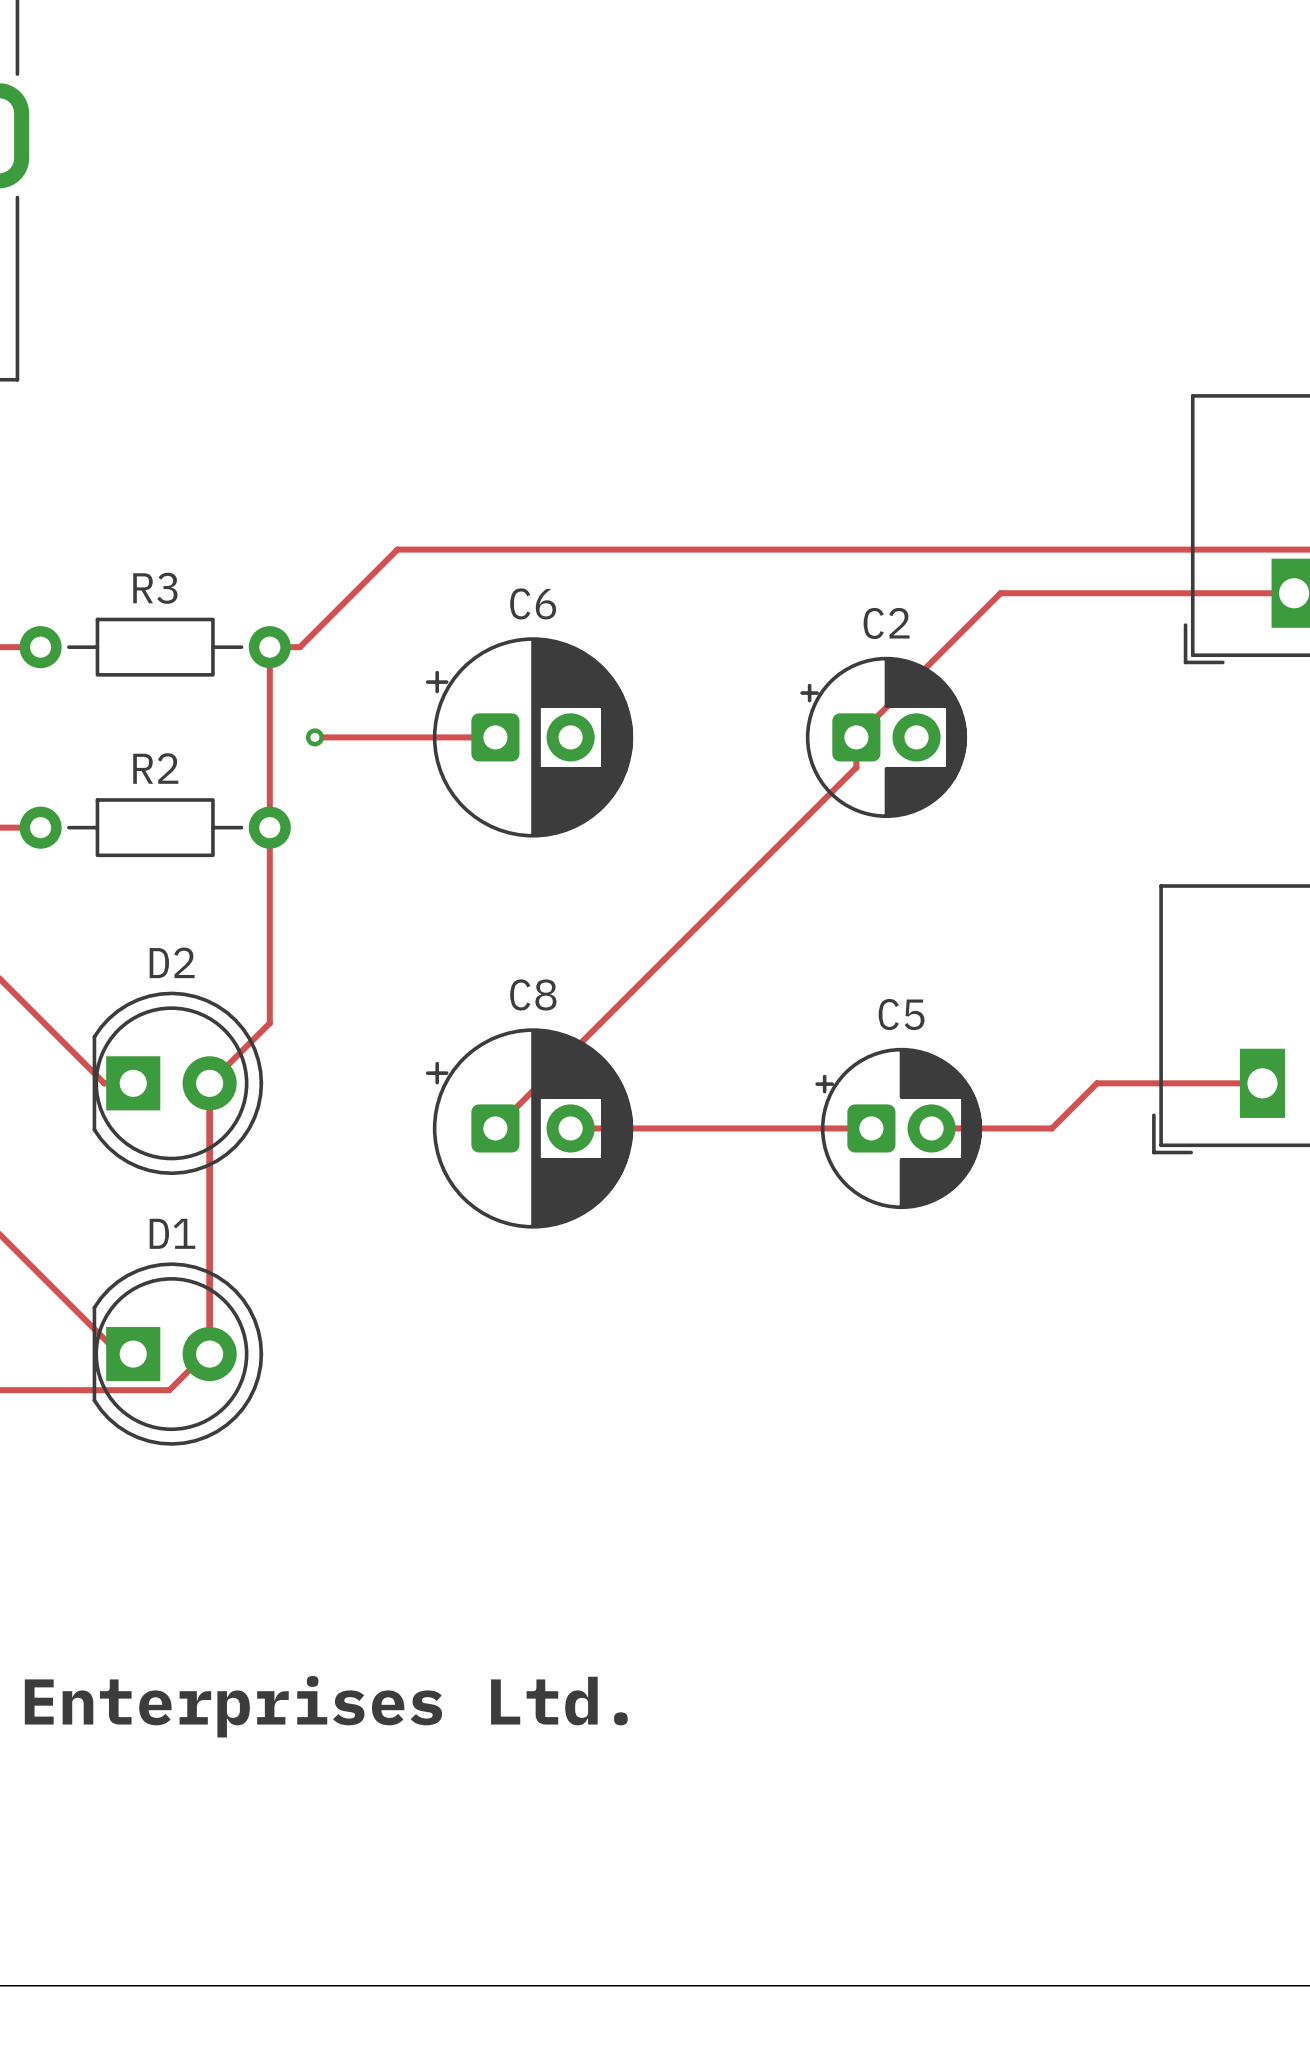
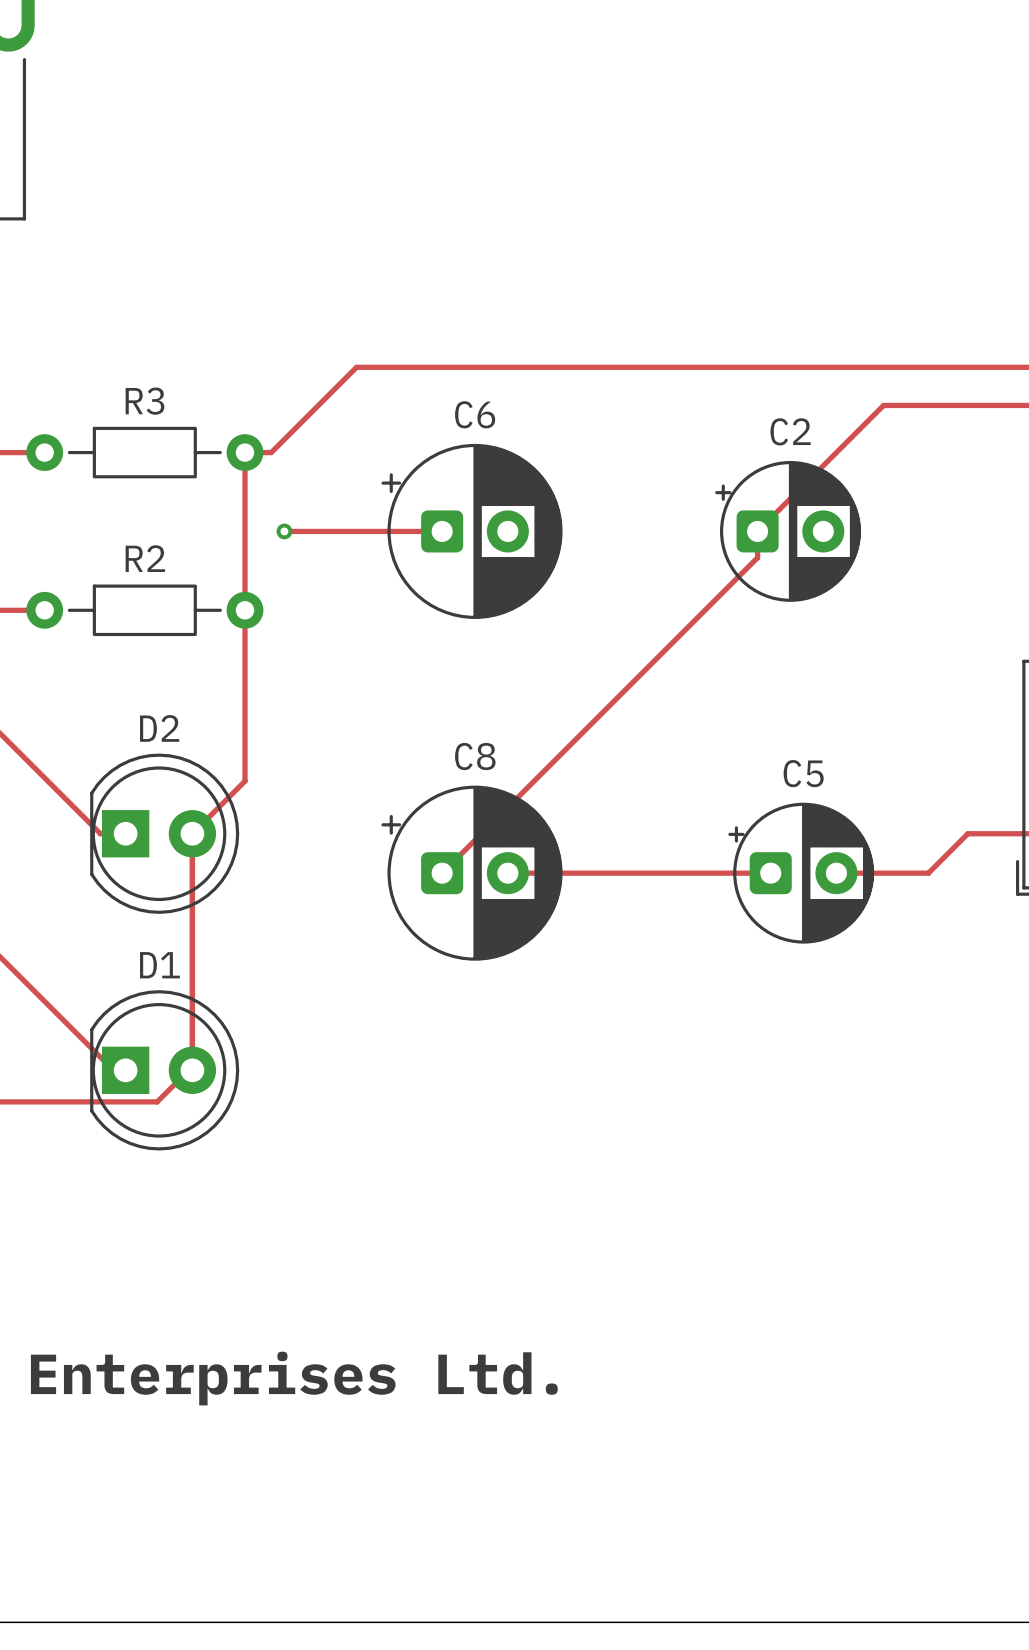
C2 footprint: [800, 656, 968, 819] -> [715, 460, 861, 602]
C5 footprint: [815, 1047, 983, 1210] -> [728, 802, 875, 944]

